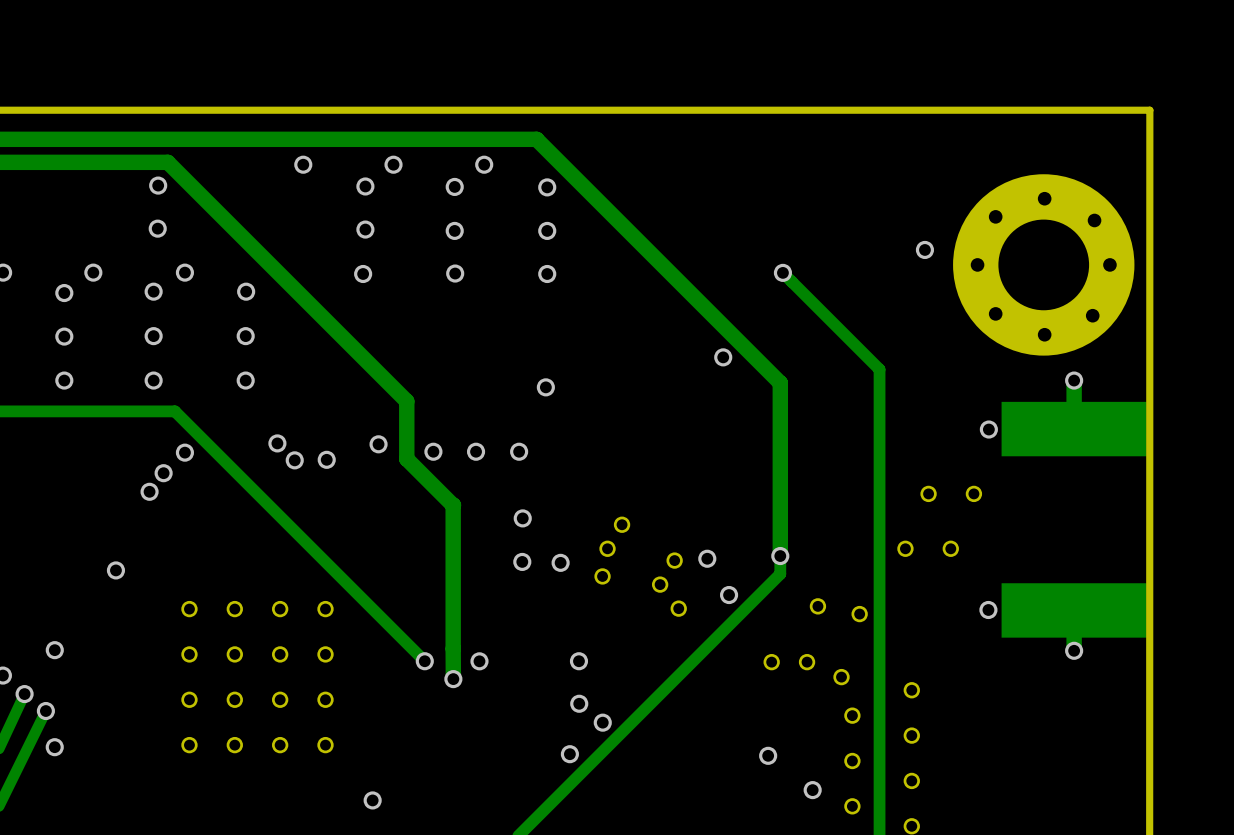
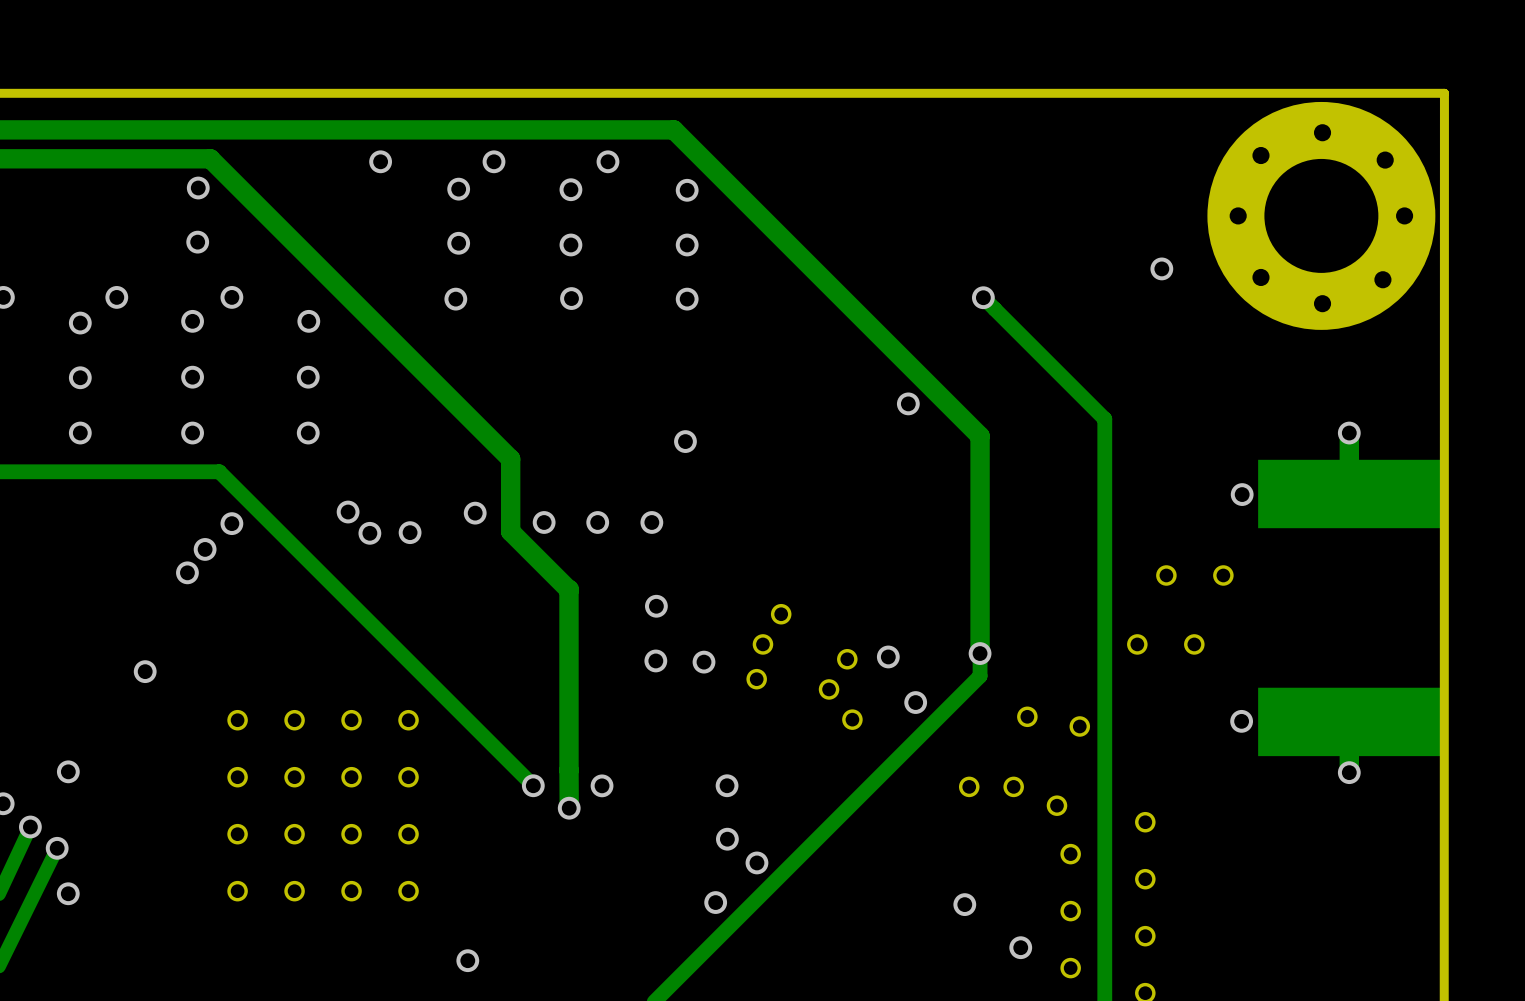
part position: (1043, 264) -> (1321, 215)

